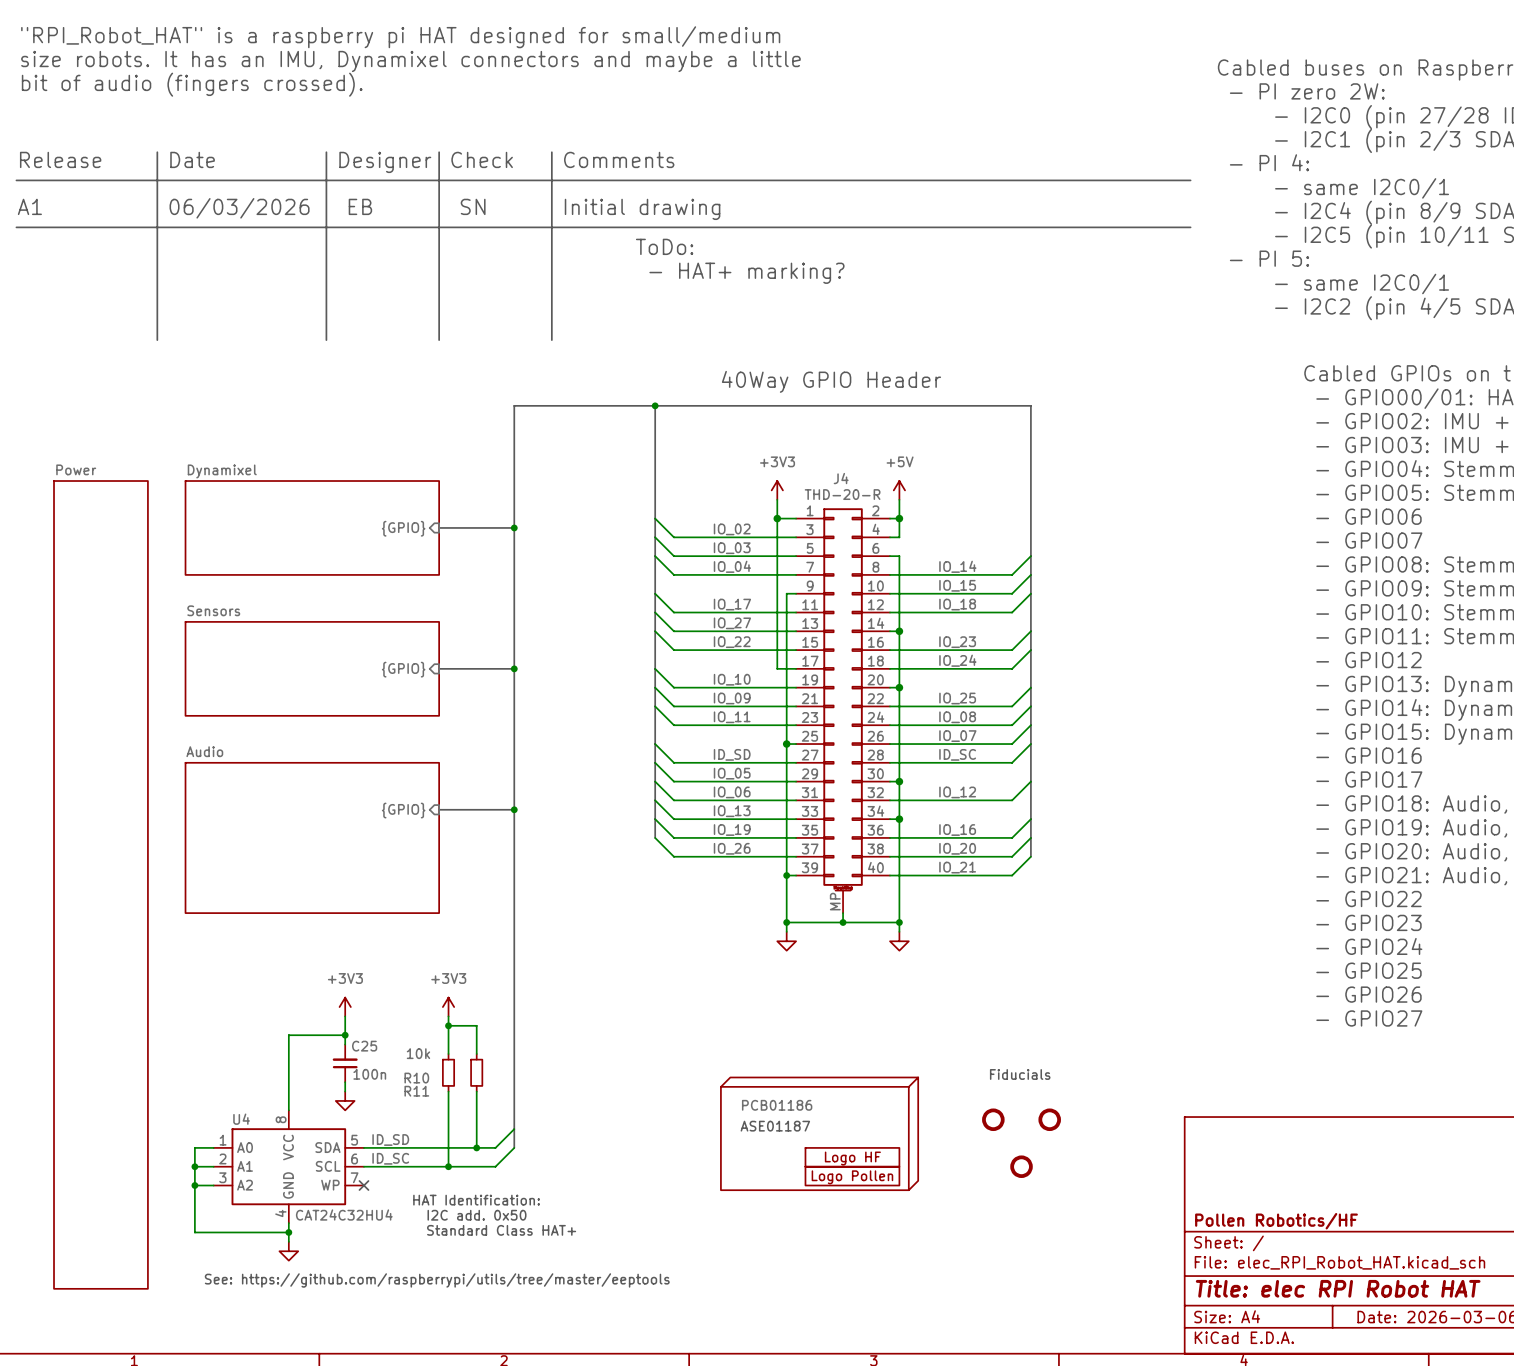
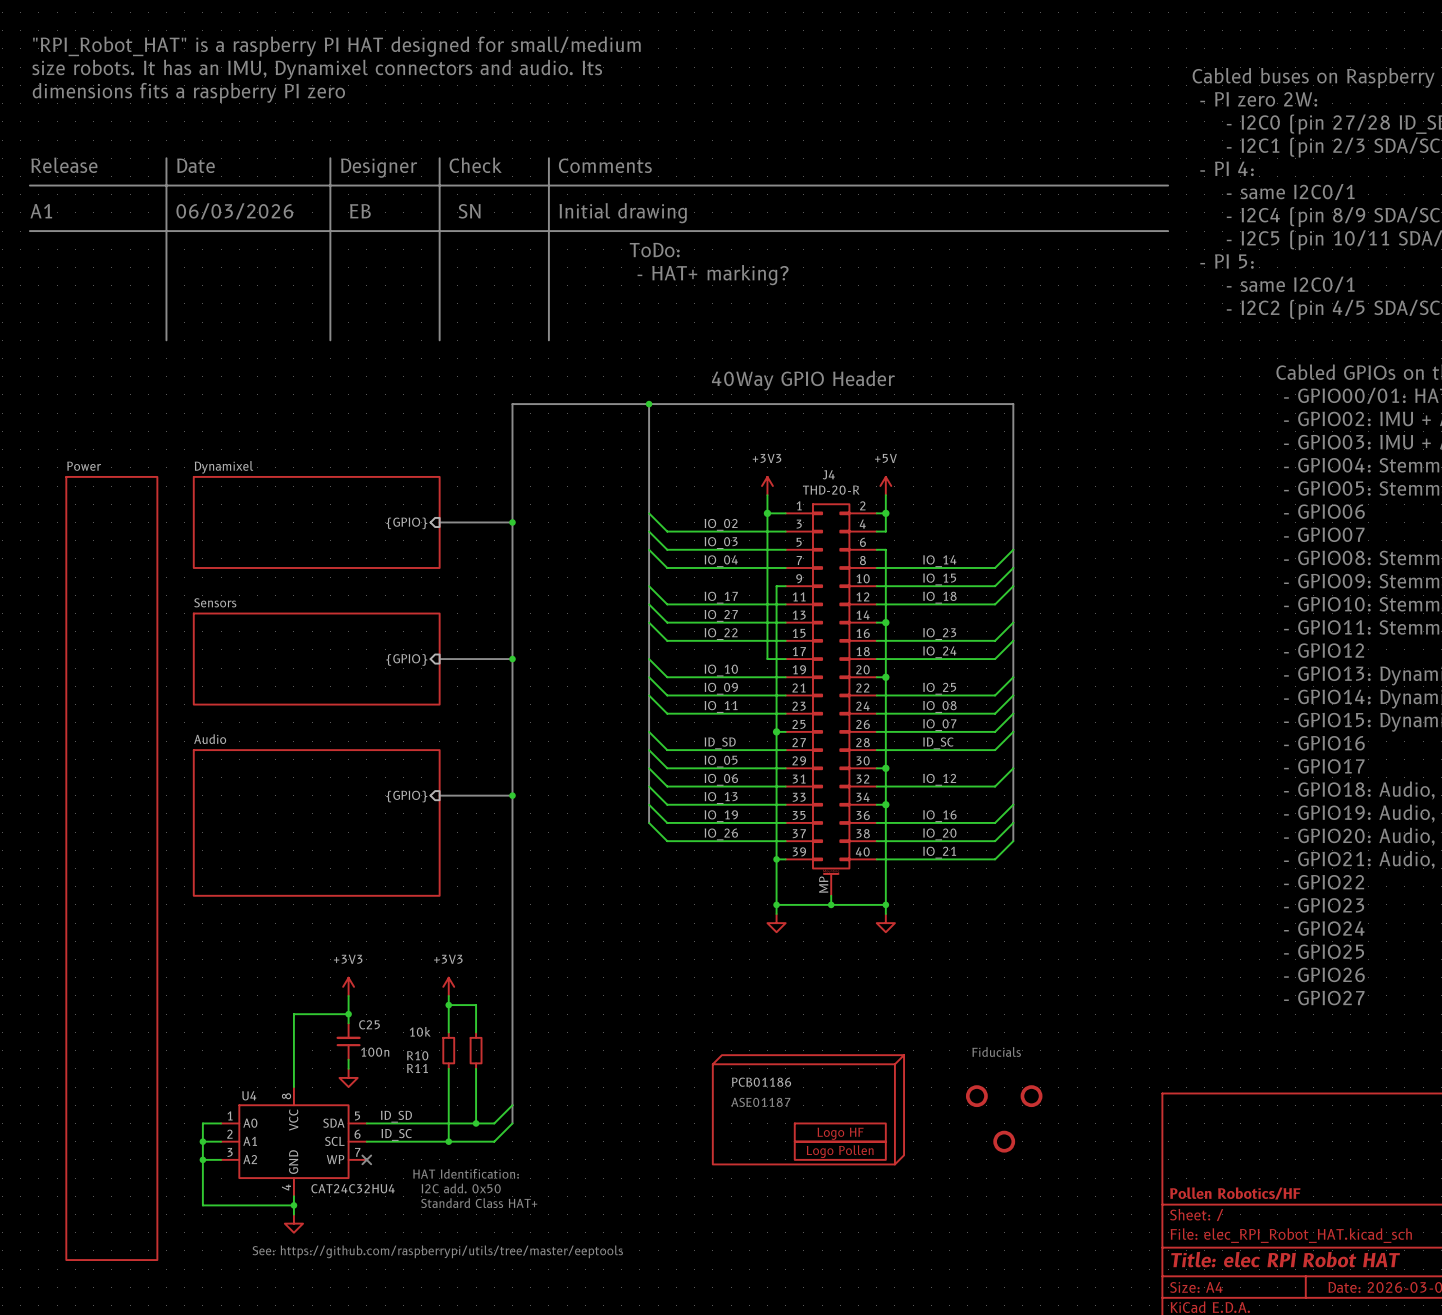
text: "RPI_Robot_HAT" is a raspberry pi HAT designed for small/medium (400, 37) -> "RPI_Robot_HAT" is a raspberry PI HAT designed for small/medium (336, 46)
text: size robots. It has an IMU, Dynamixel connectors and maybe a little (410, 61) -> size robots. It has an IMU, Dynamixel connectors and audio. Its (317, 69)
text: bit of audio (fingers crossed). (192, 84) -> dimensions fits a raspberry PI zero (188, 92)

